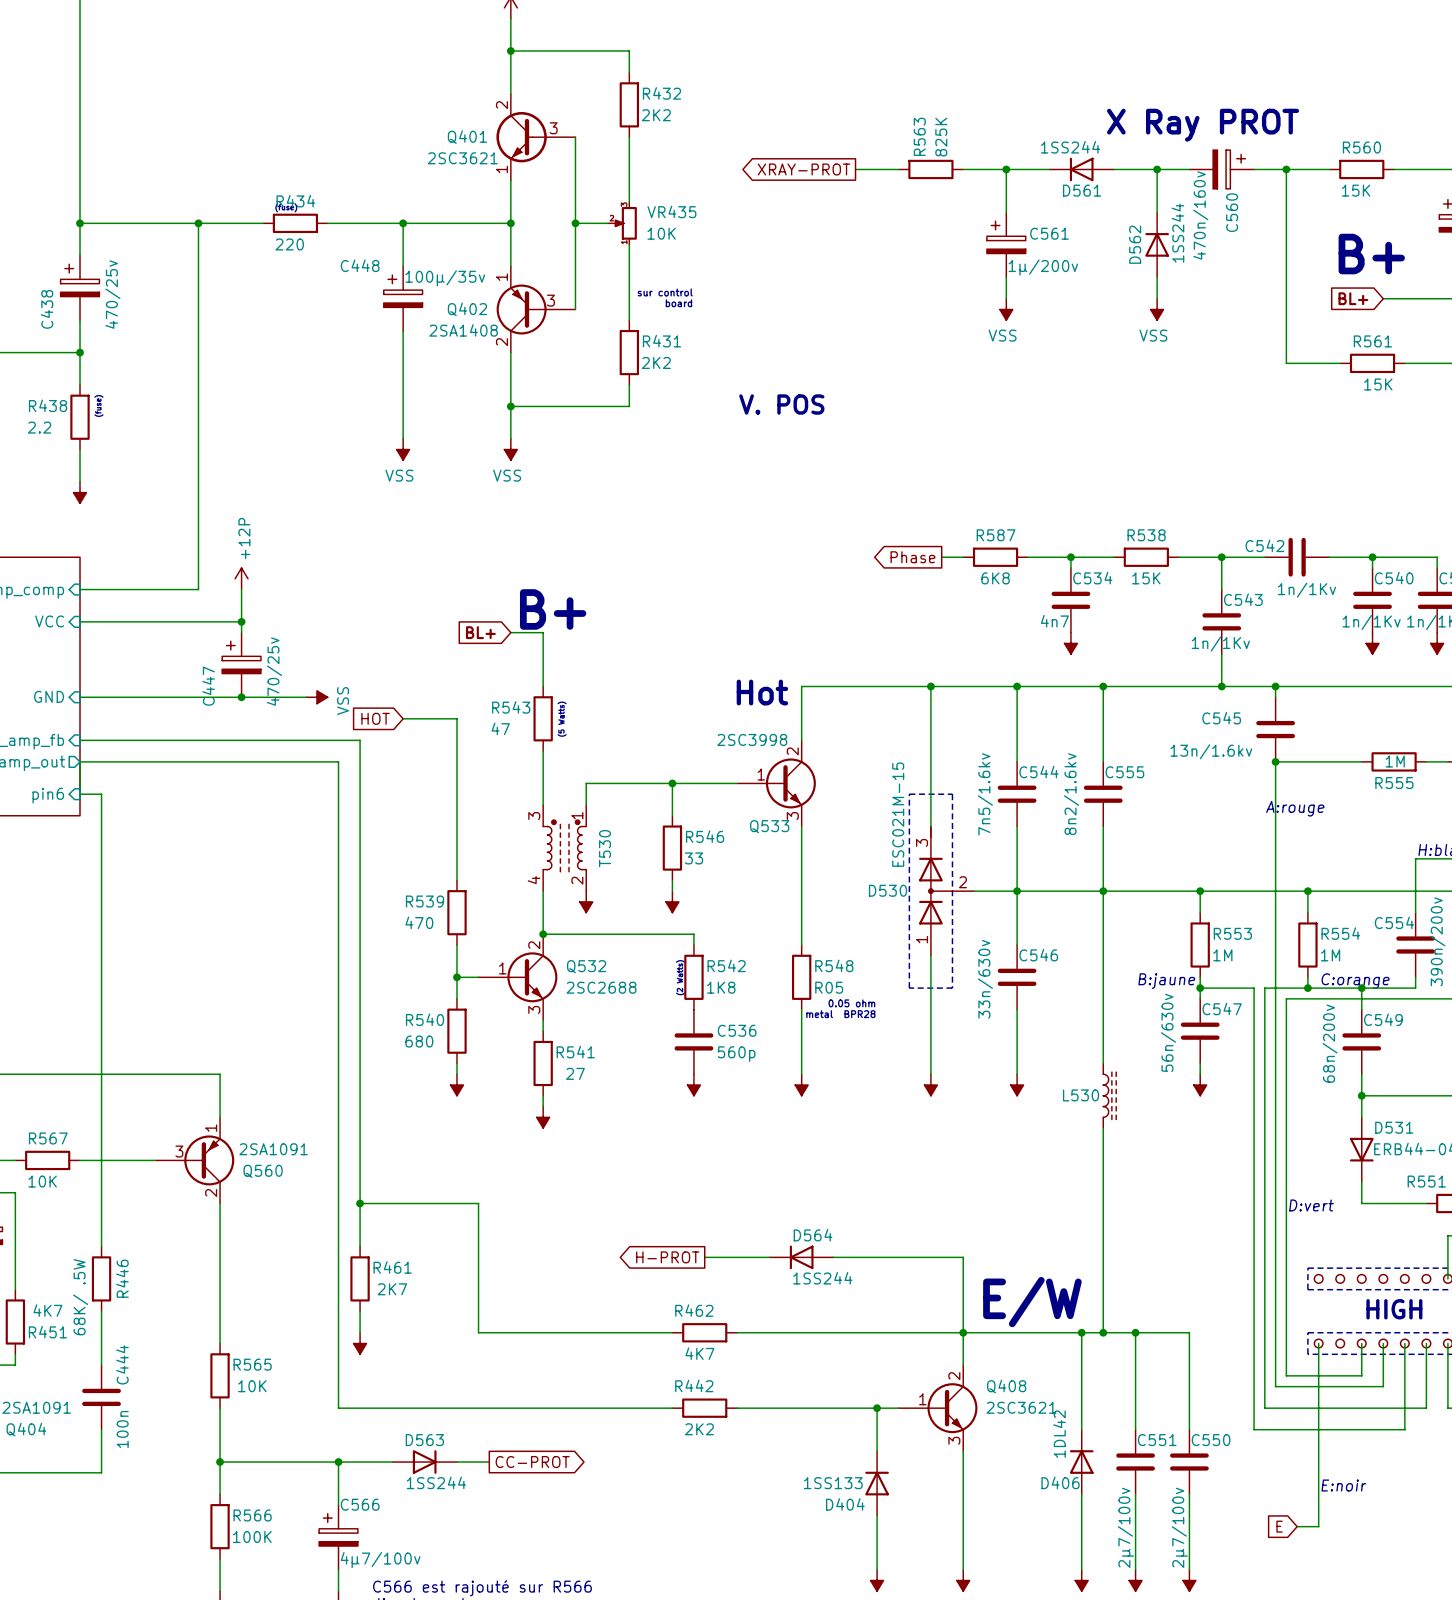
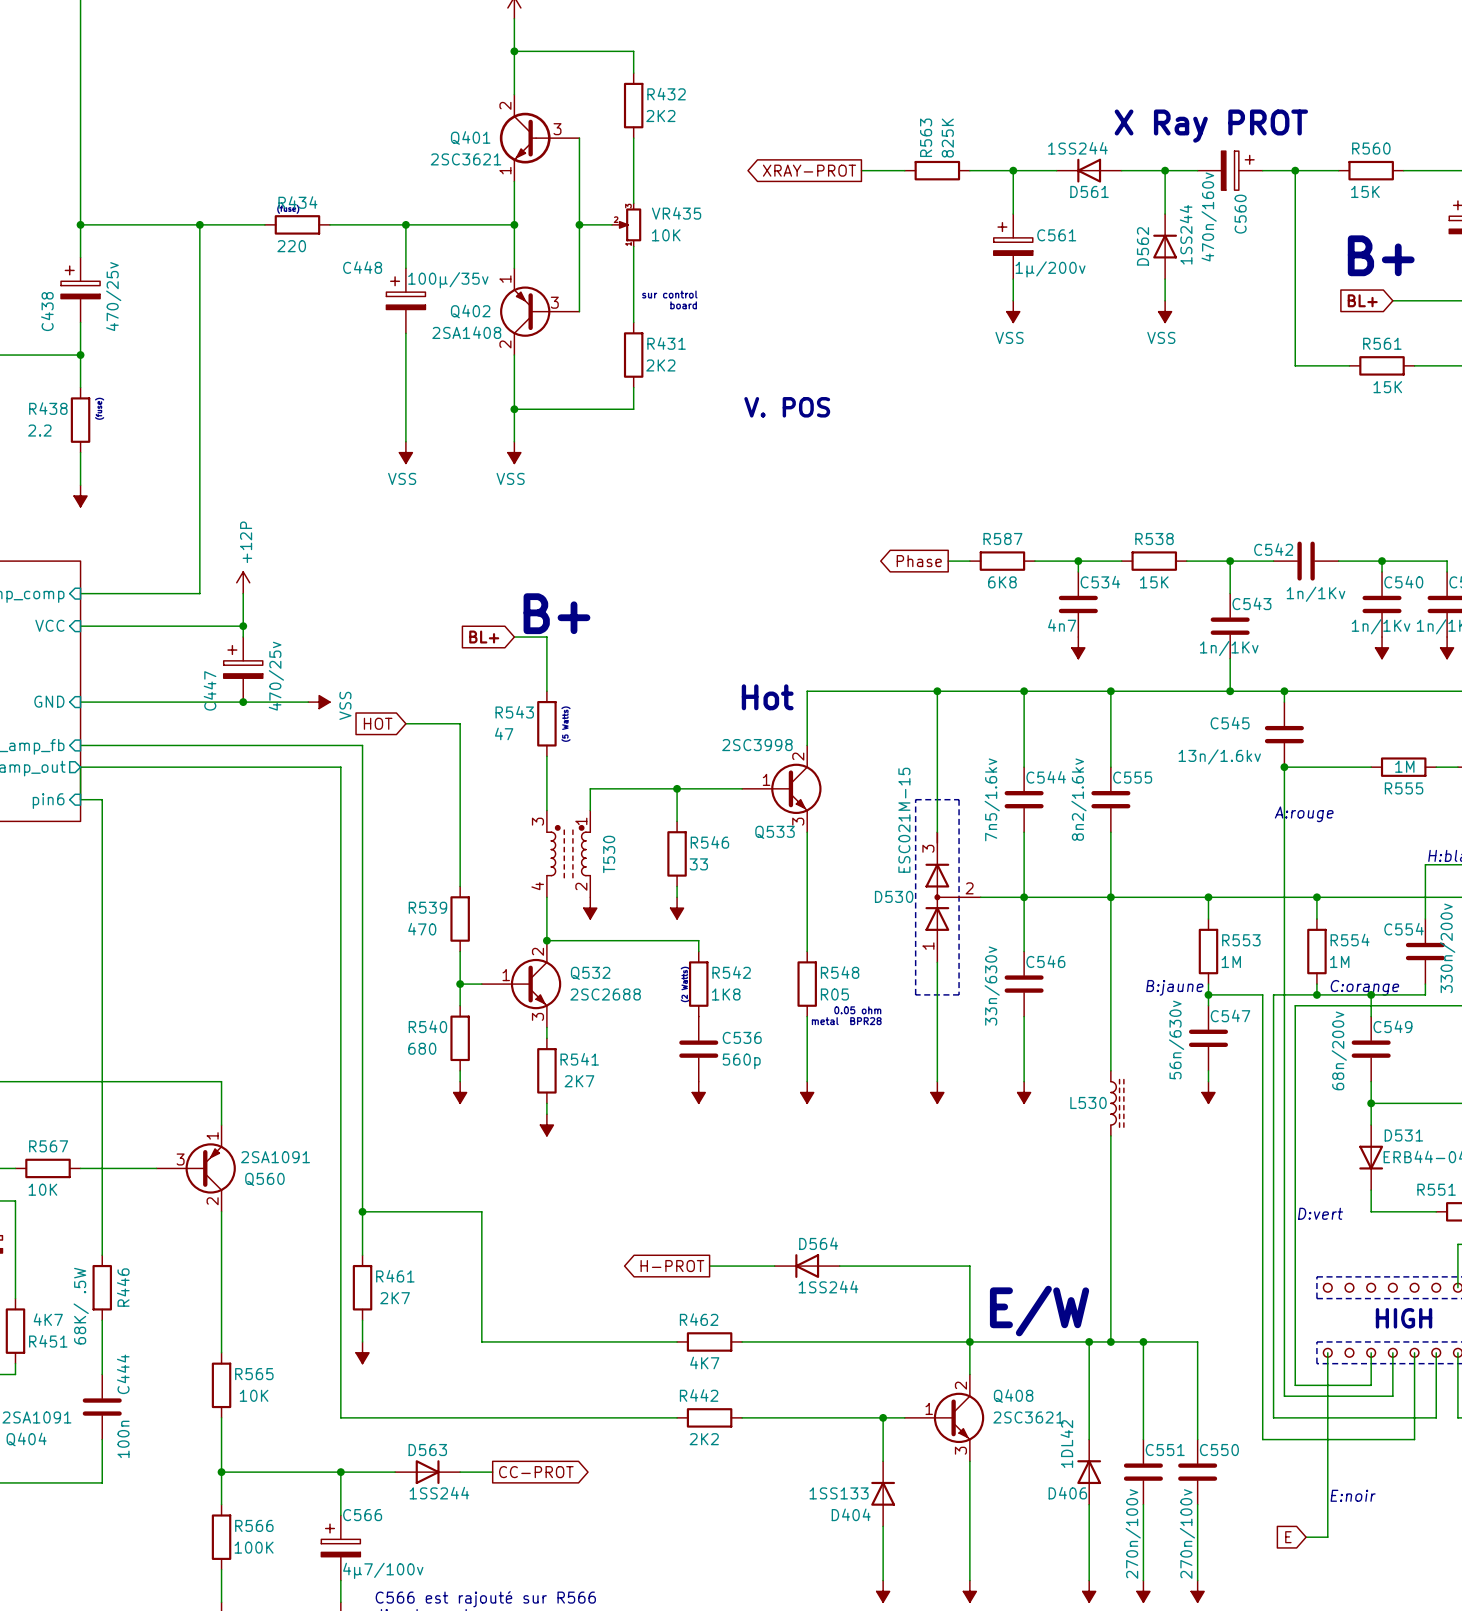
C554 value: 390n/200v (1437, 941) -> 330n/200v (1447, 948)
R541 value: 27 (575, 1073) -> 2K7 (579, 1081)
C551 value: 2µ7/100v (1125, 1527) -> 270n/100v (1133, 1534)
C550 value: 2µ7/100v (1179, 1527) -> 270n/100v (1187, 1534)

